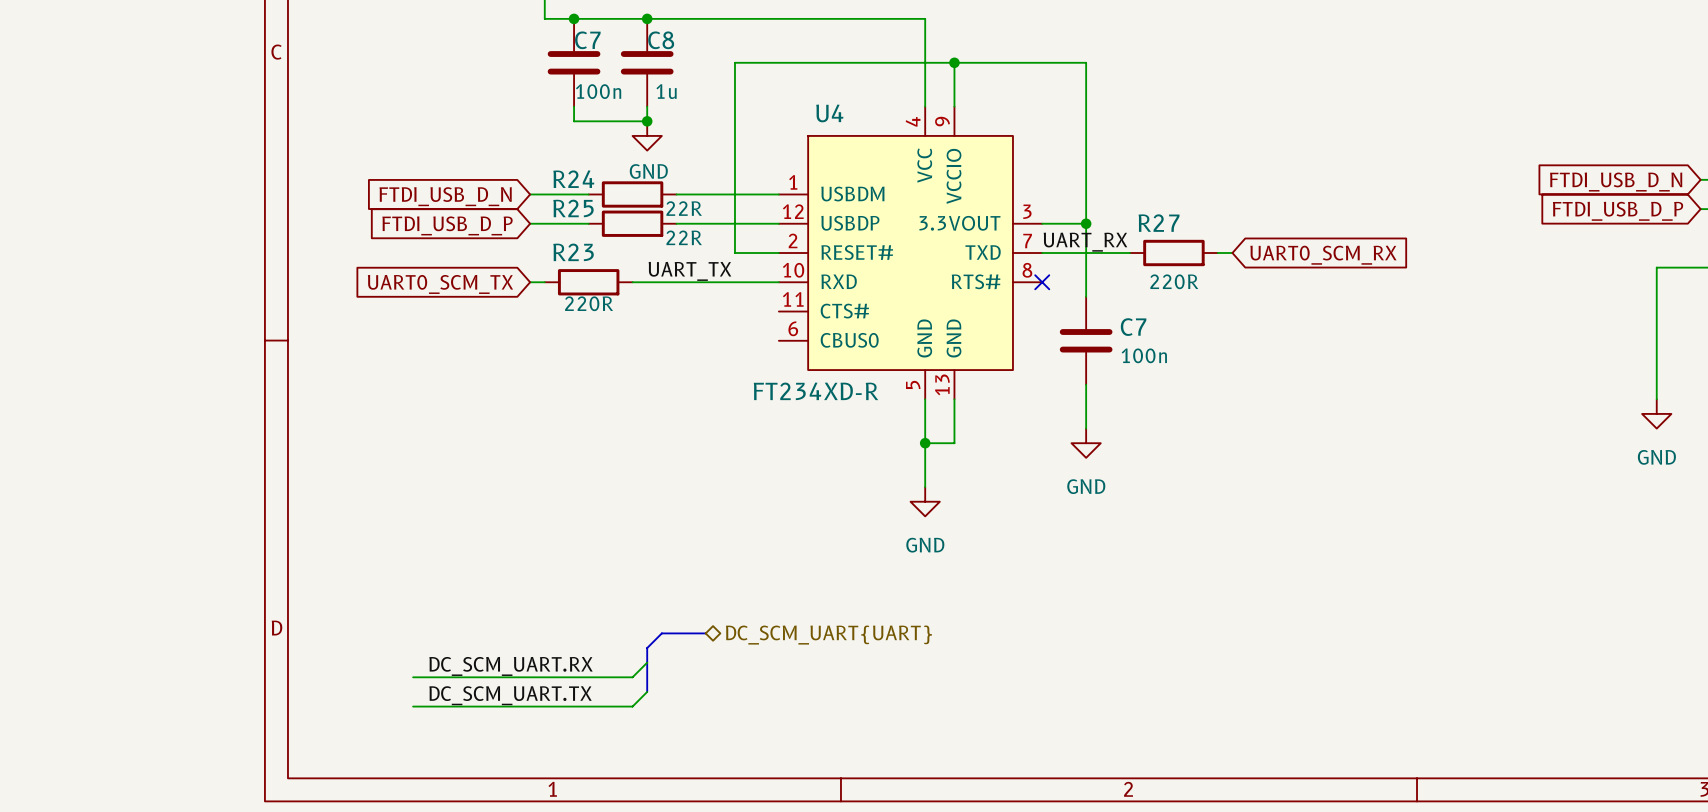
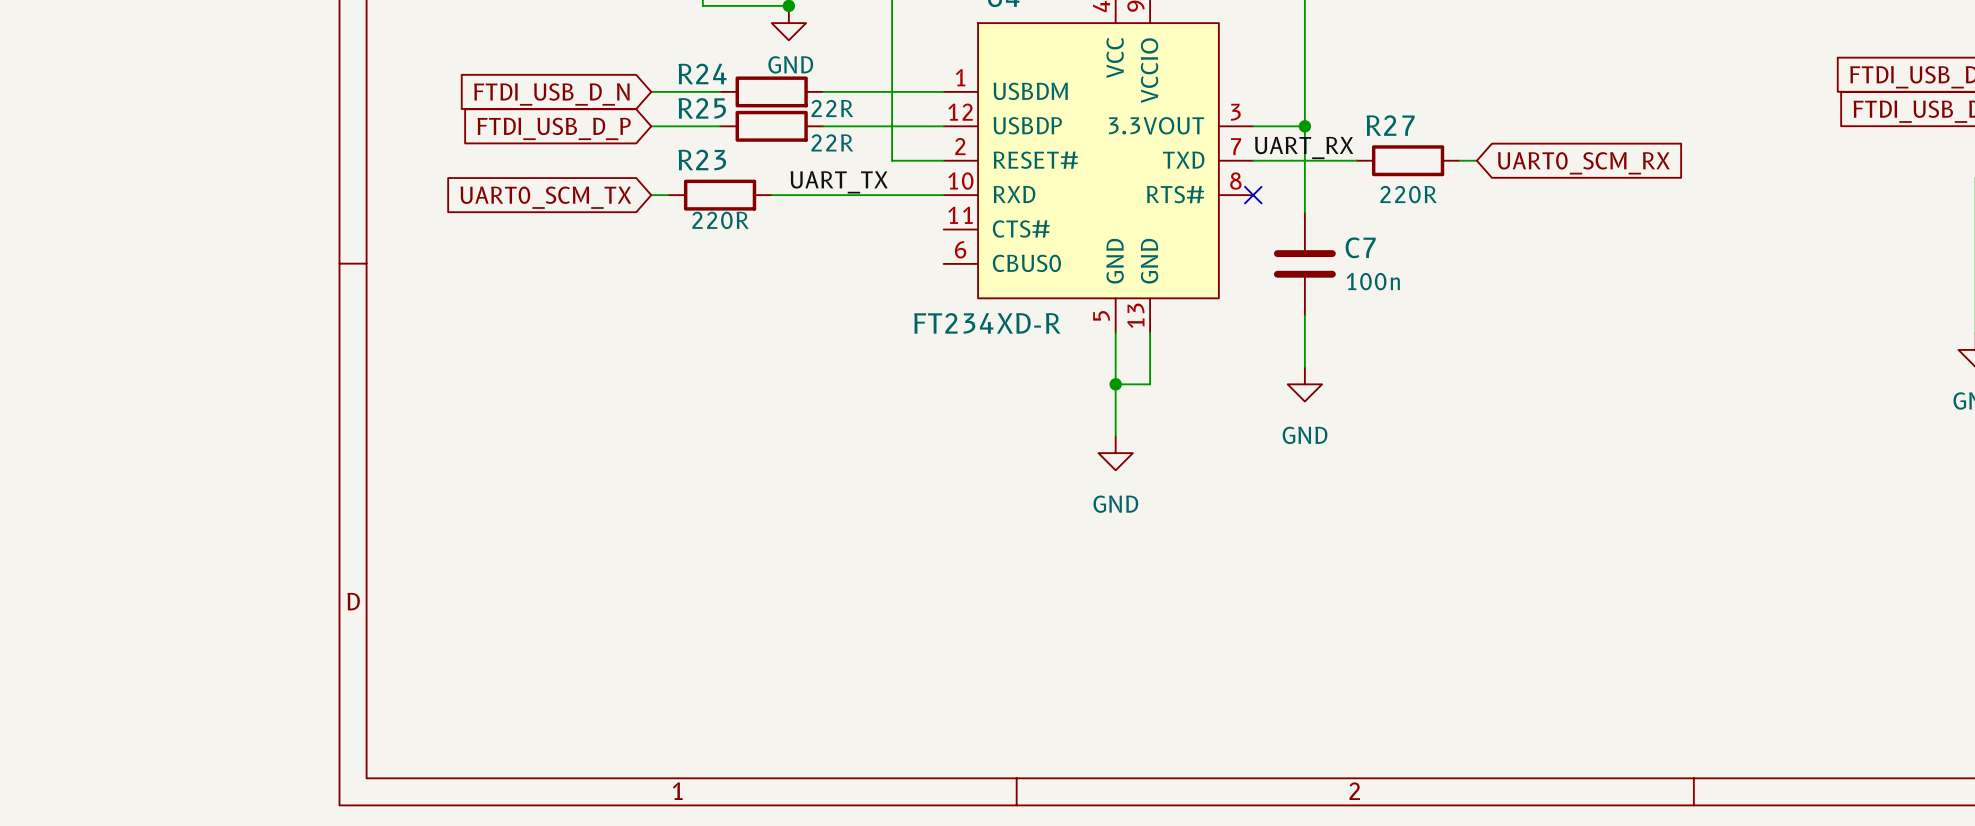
bus: (705, 633) (661, 633) (647, 648) (647, 691) -> none
hierarchical label: DC_SCM_UART{UART} (828, 635) -> none
wire: (647, 662) (632, 677) (413, 677) -> none
label: DC_SCM_UART.RX (511, 666) -> none
wire: (647, 691) (632, 706) (413, 706) -> none
label: DC_SCM_UART.TX (510, 695) -> none

